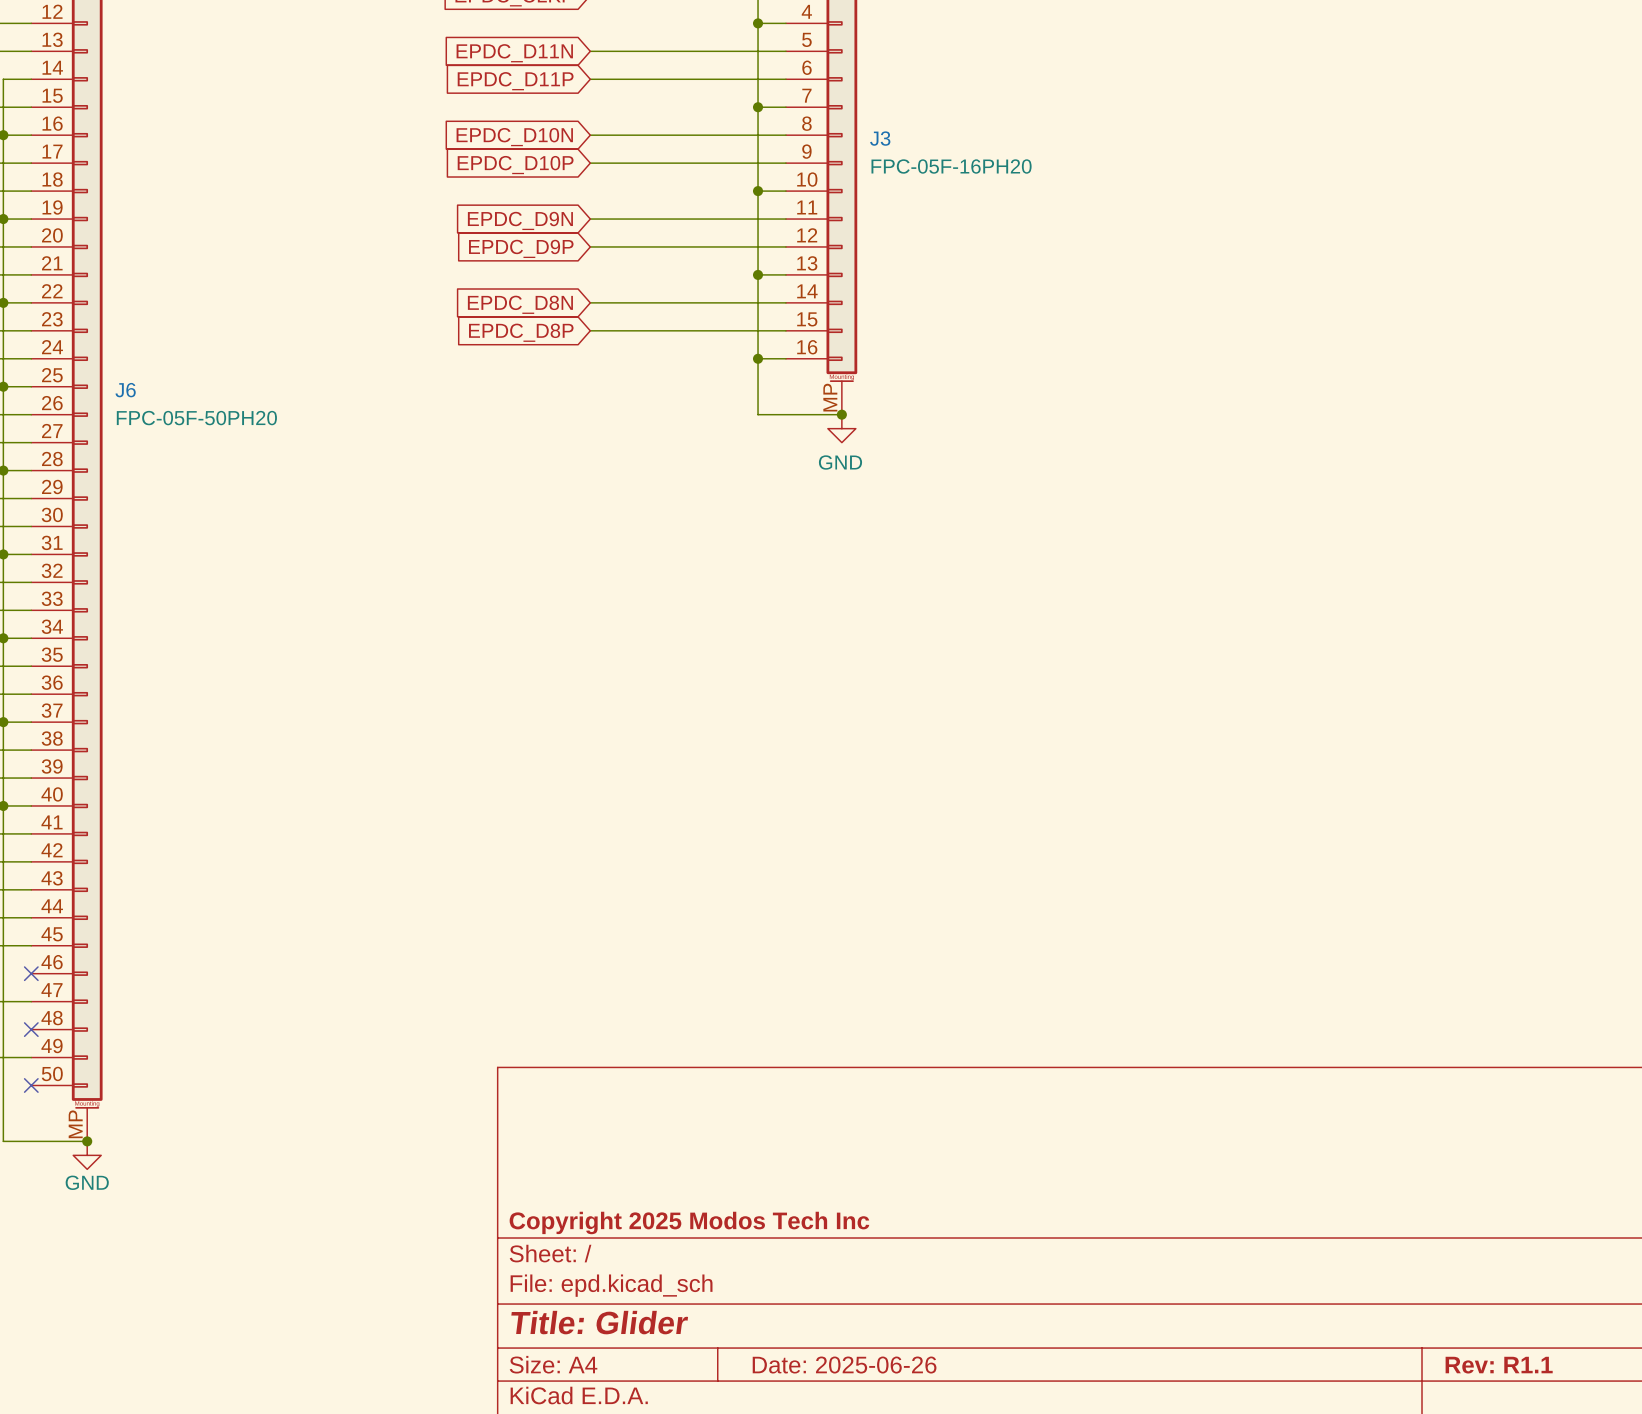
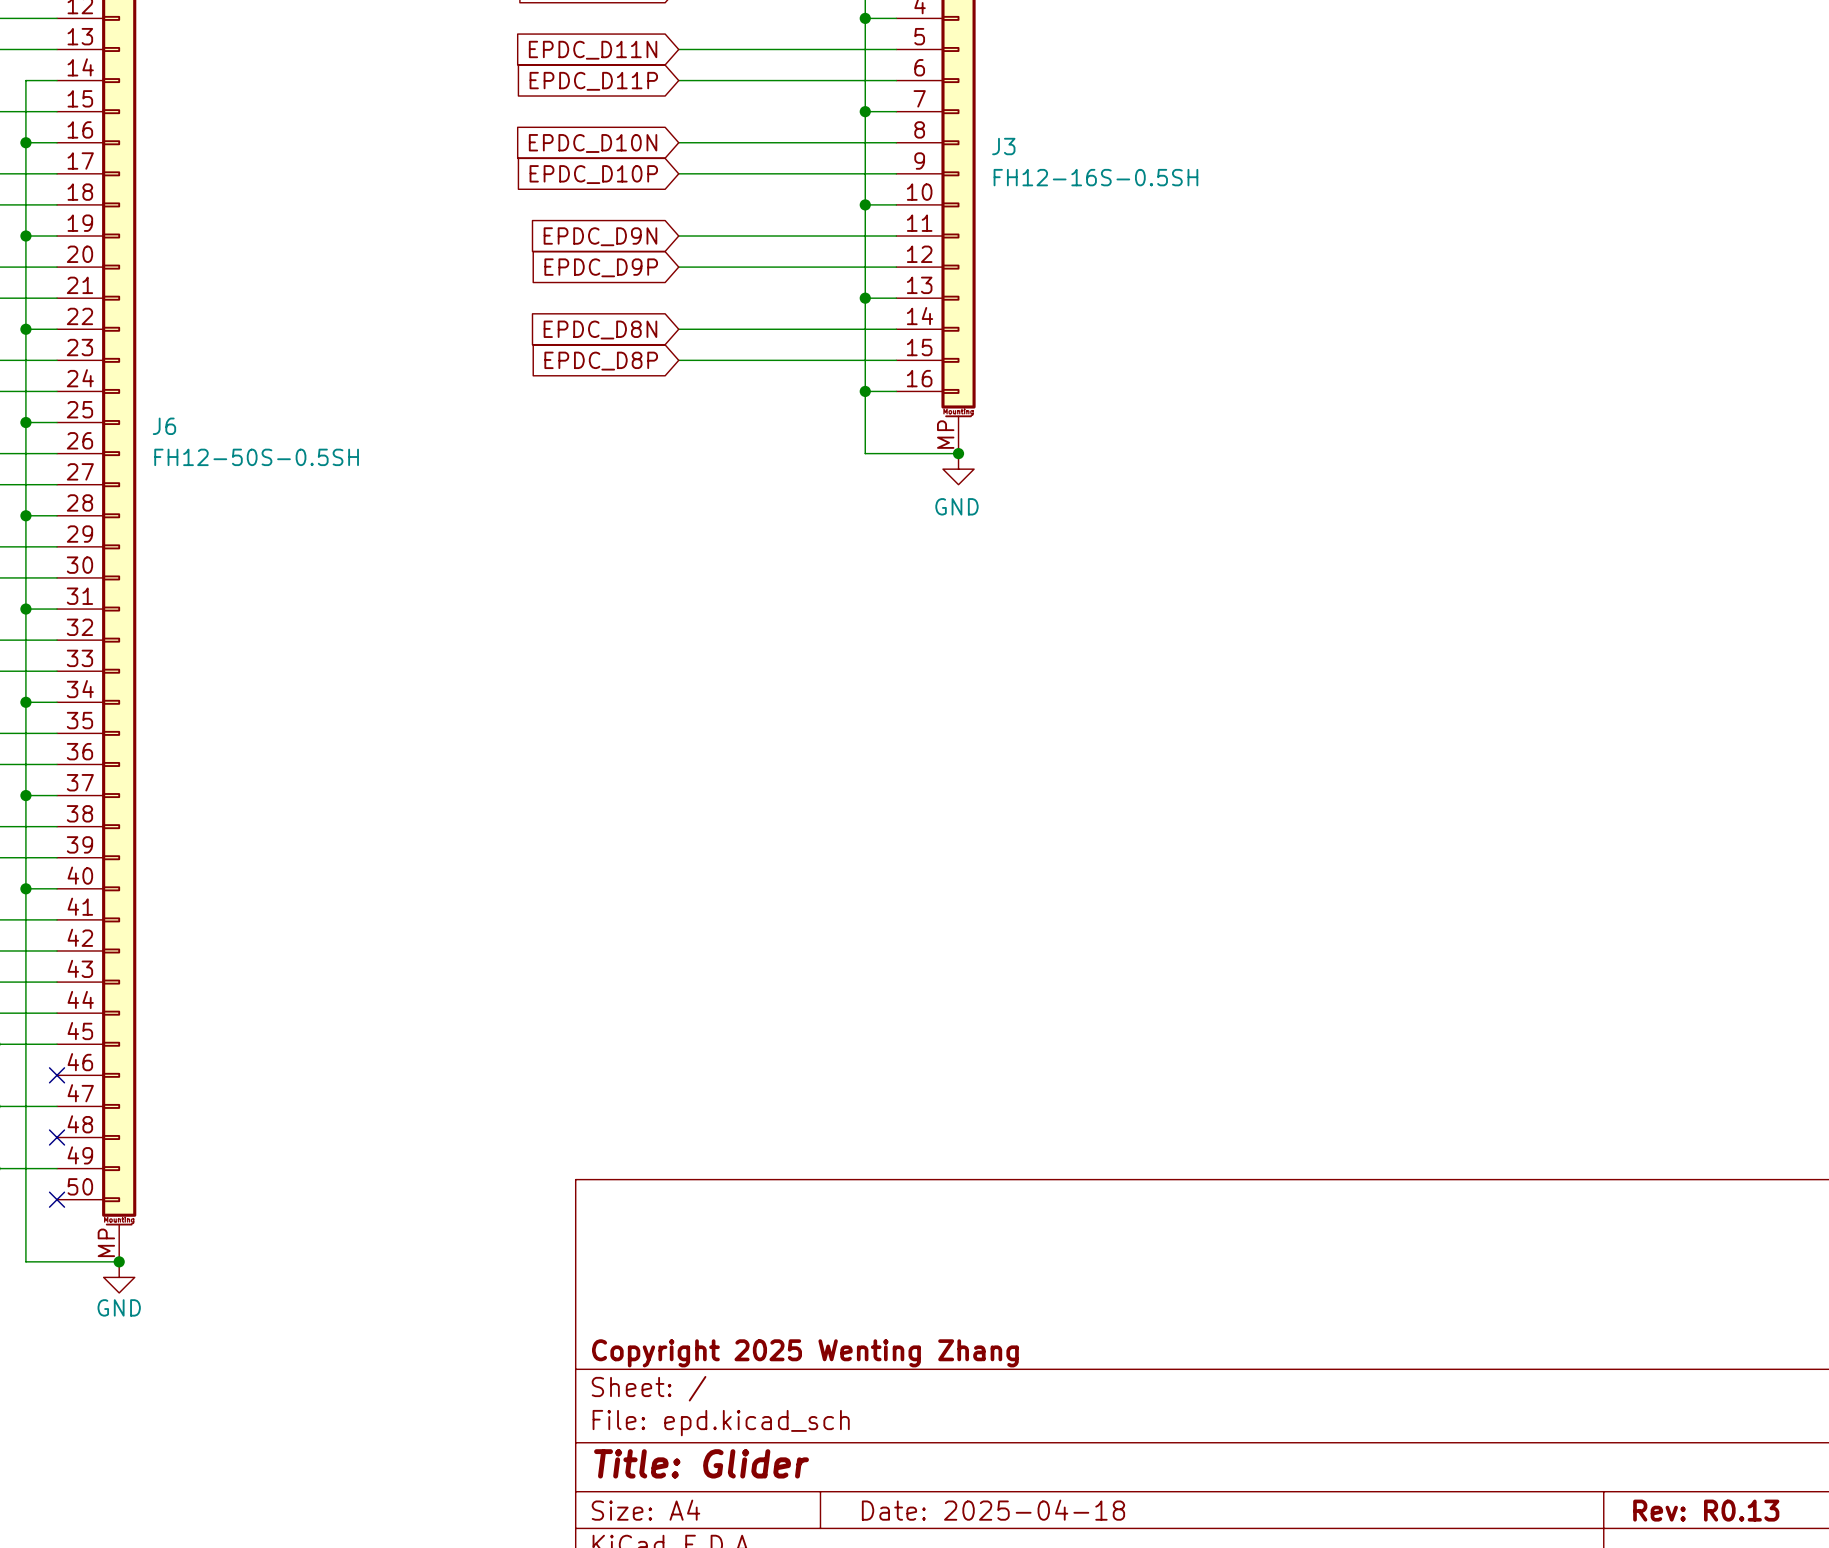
J3 value: FPC-05F-16PH20 (951, 166) -> FH12-16S-0.5SH (1095, 177)
J6 value: FPC-05F-50PH20 (196, 418) -> FH12-50S-0.5SH (256, 457)
title block: Copyright 2025 Modos Tech Inc (689, 1222) -> Copyright 2025 Wenting Zhang (805, 1353)
title block: Date: 2025-06-26 (844, 1365) -> Date: 2025-04-18 (993, 1510)
title block: Rev: R1.1 (1499, 1365) -> Rev: R0.13 (1706, 1510)

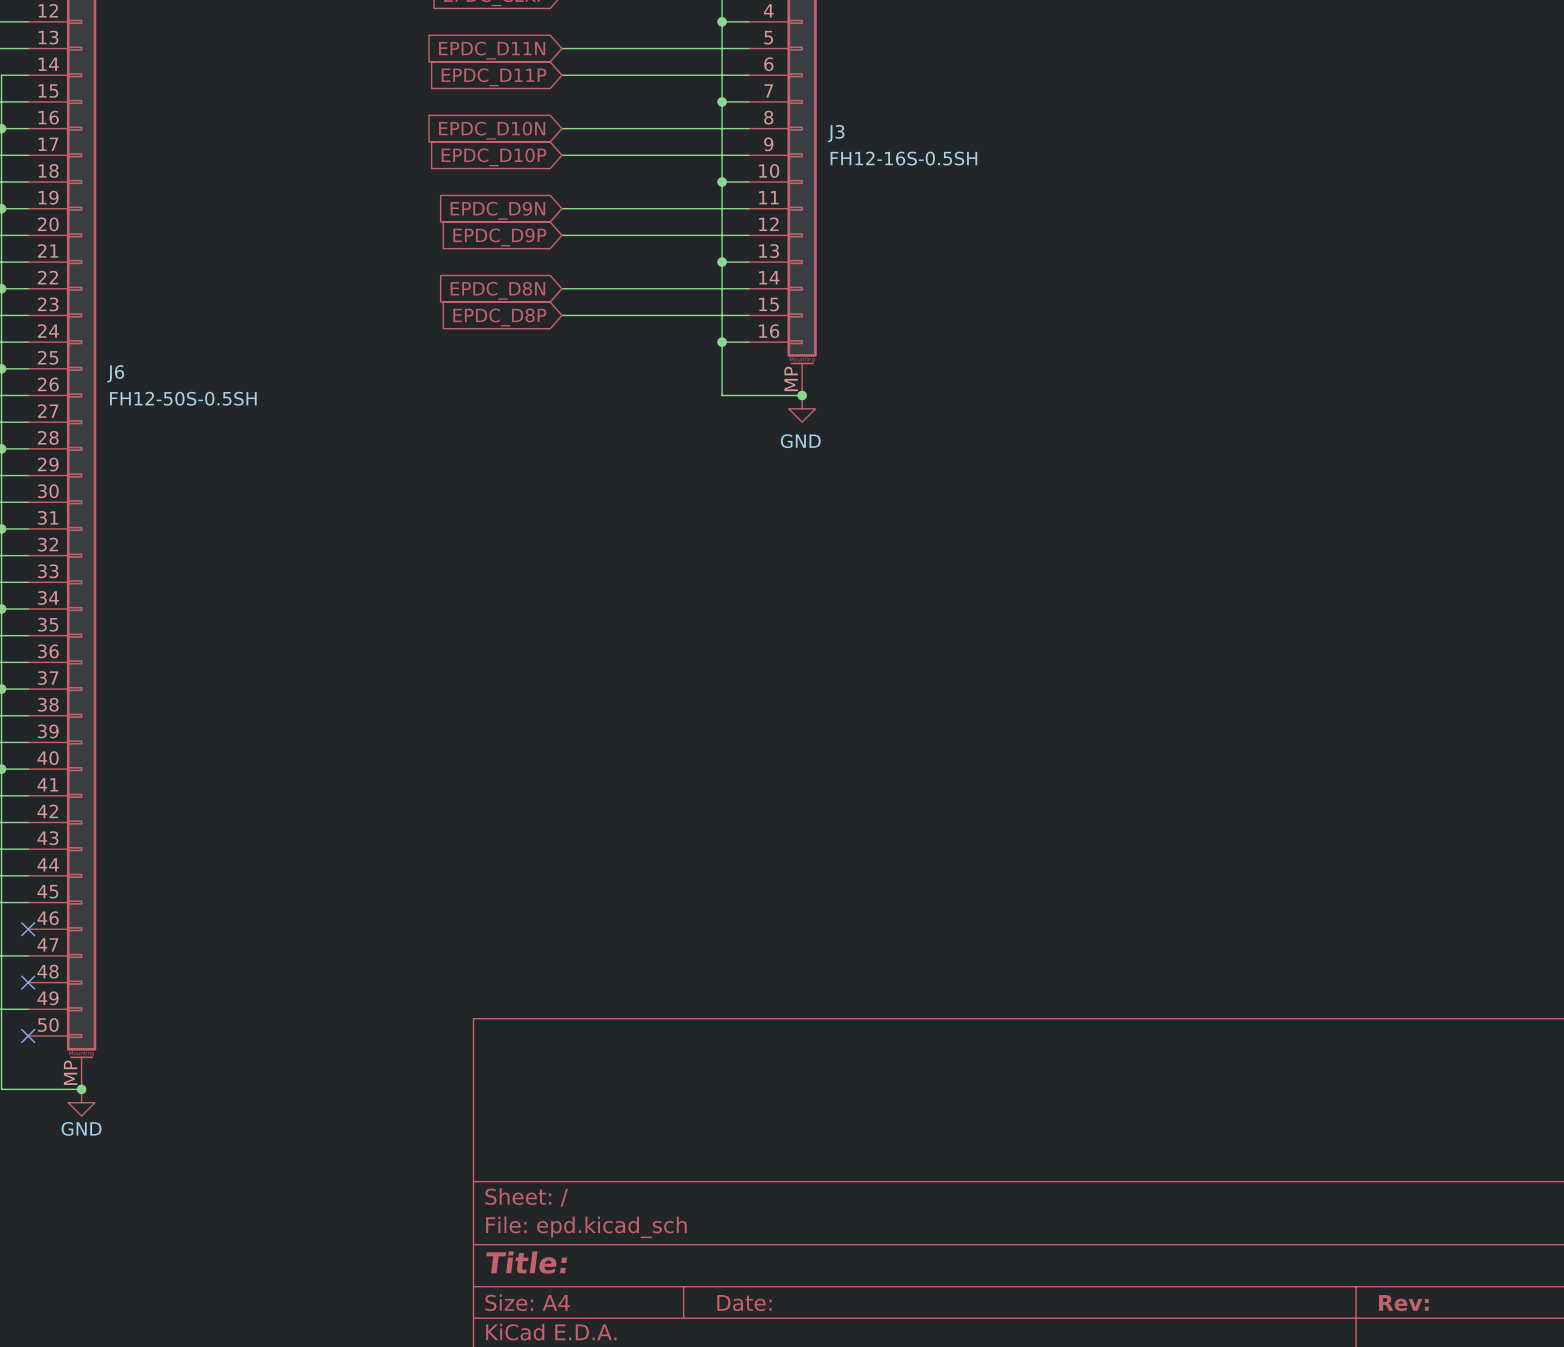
title block: Copyright 2025 Wenting Zhang (805, 1353) -> none
title block: Title: Glider (701, 1463) -> Title: (526, 1262)
title block: Date: 2025-04-18 (993, 1510) -> Date: (744, 1303)
title block: Rev: R0.13 (1706, 1510) -> Rev: (1403, 1303)

